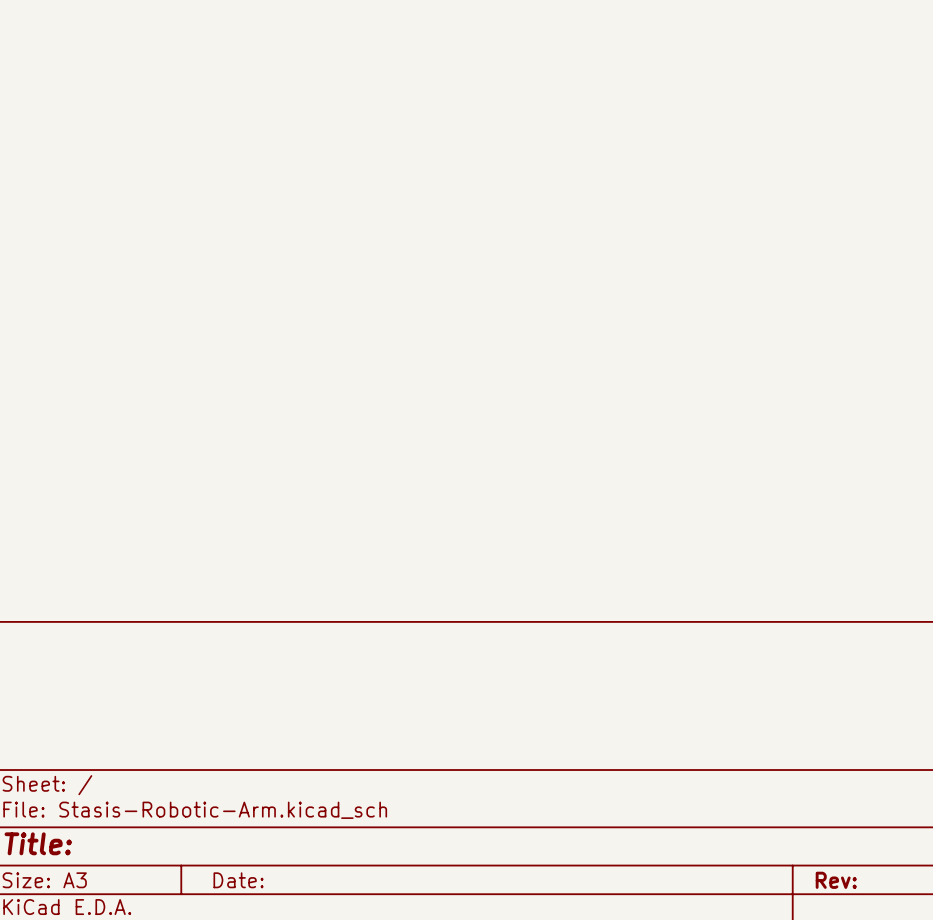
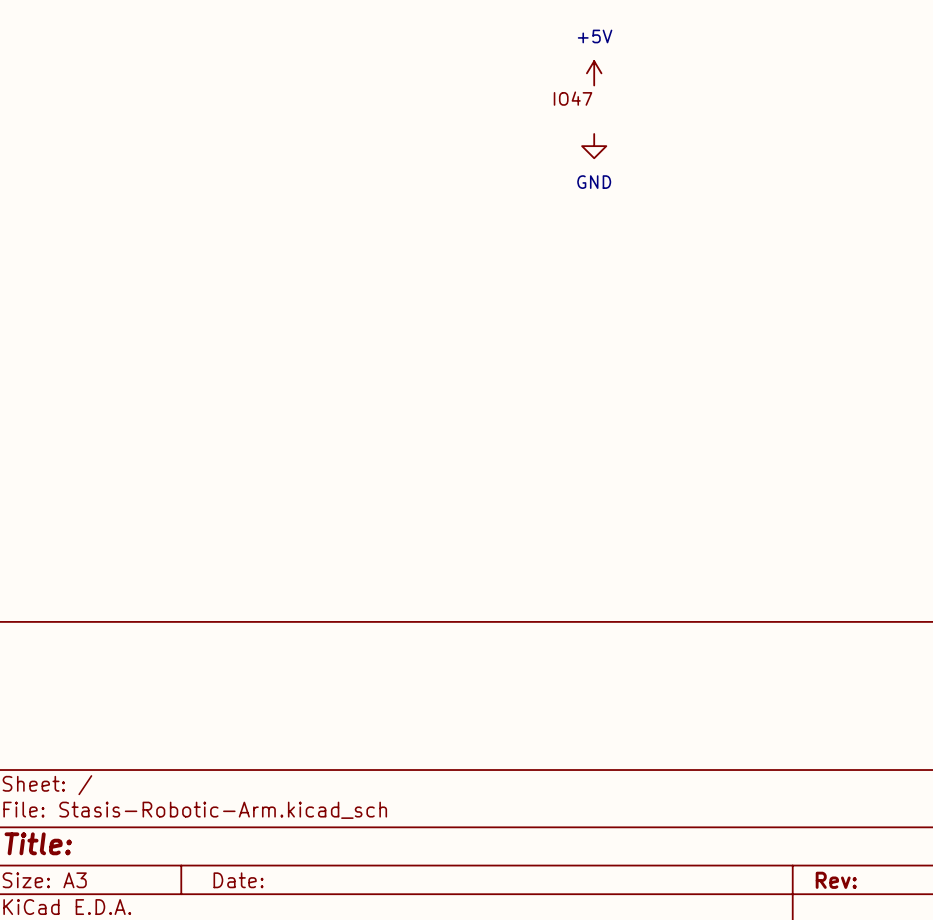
power symbol: none -> +5V (594, 73)
label: none -> IO47 (573, 98)
power symbol: none -> GND (594, 146)

